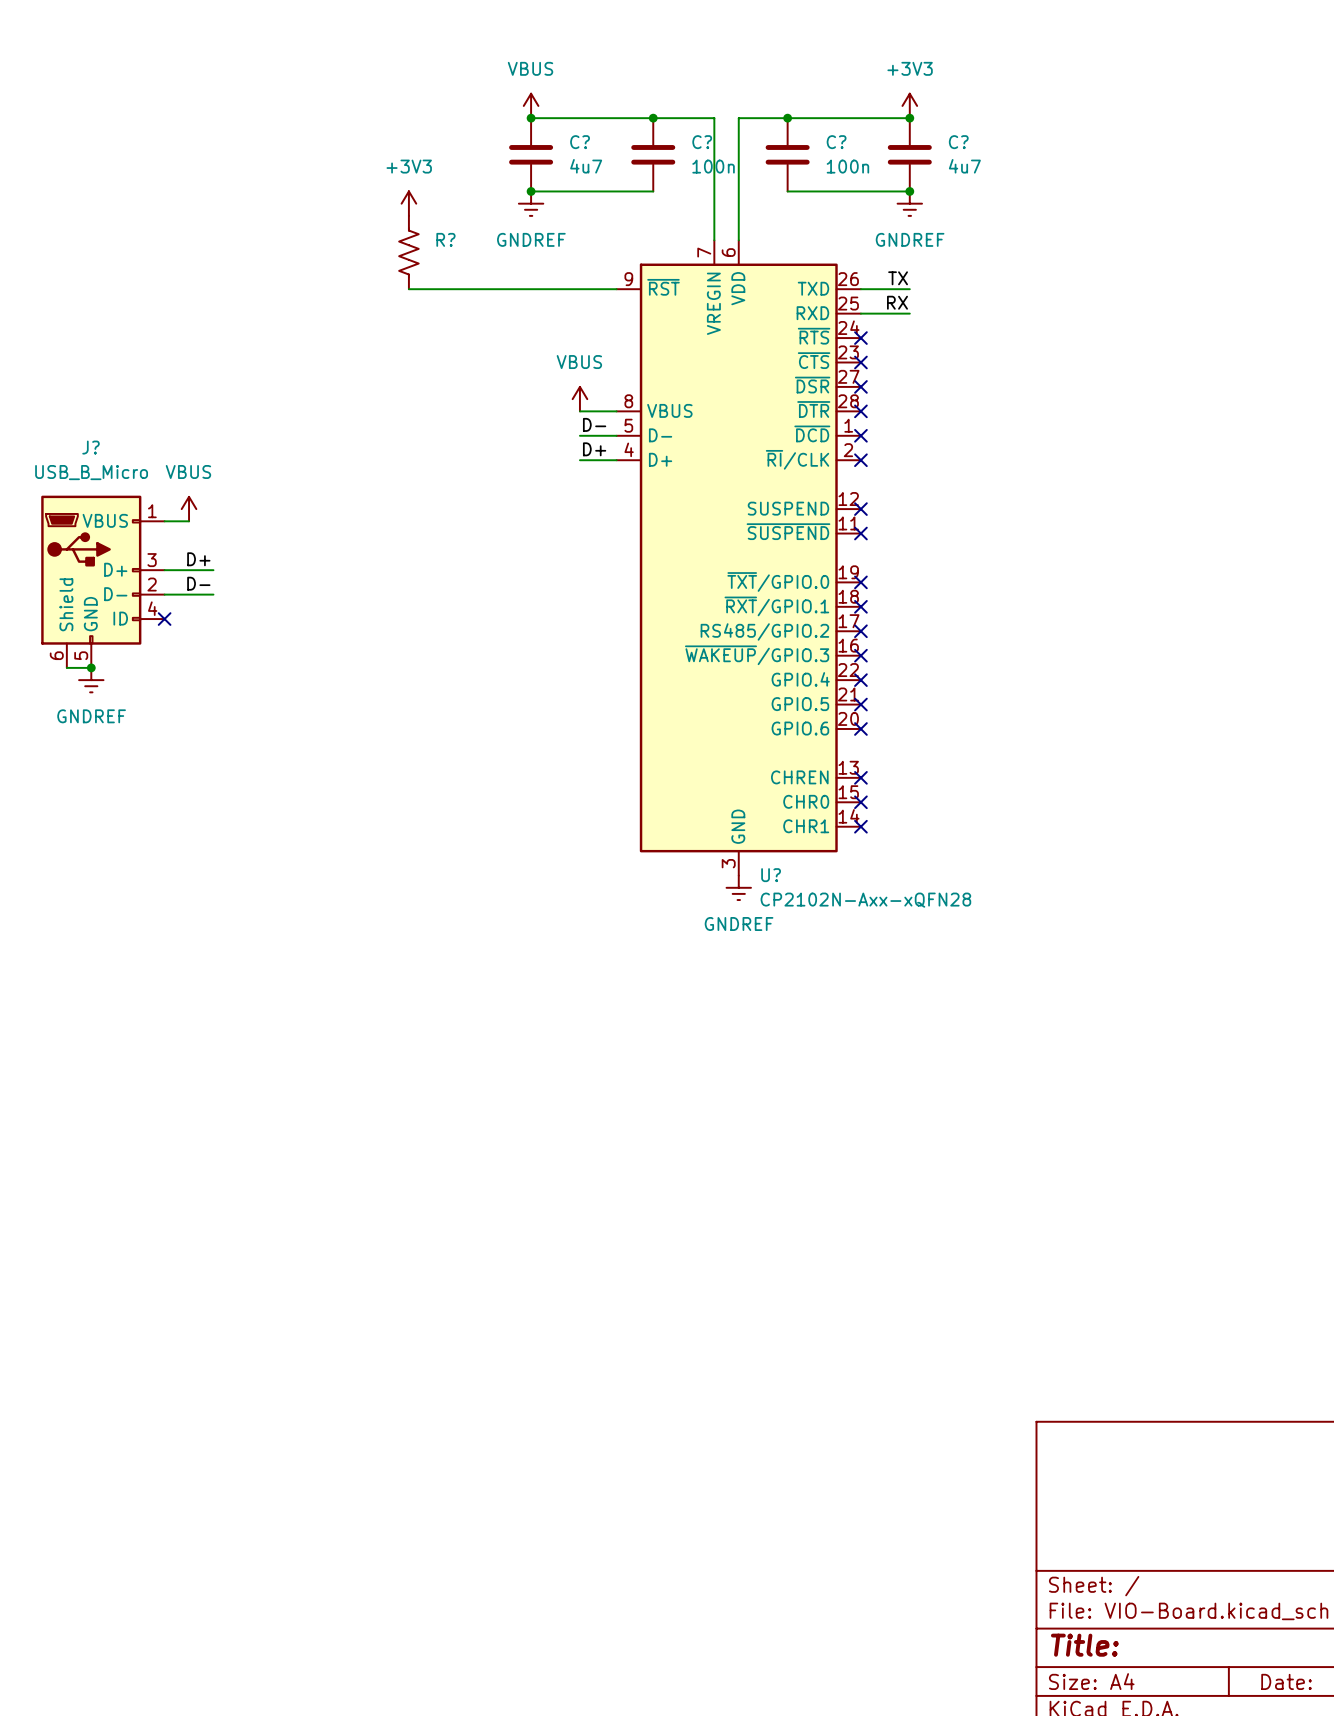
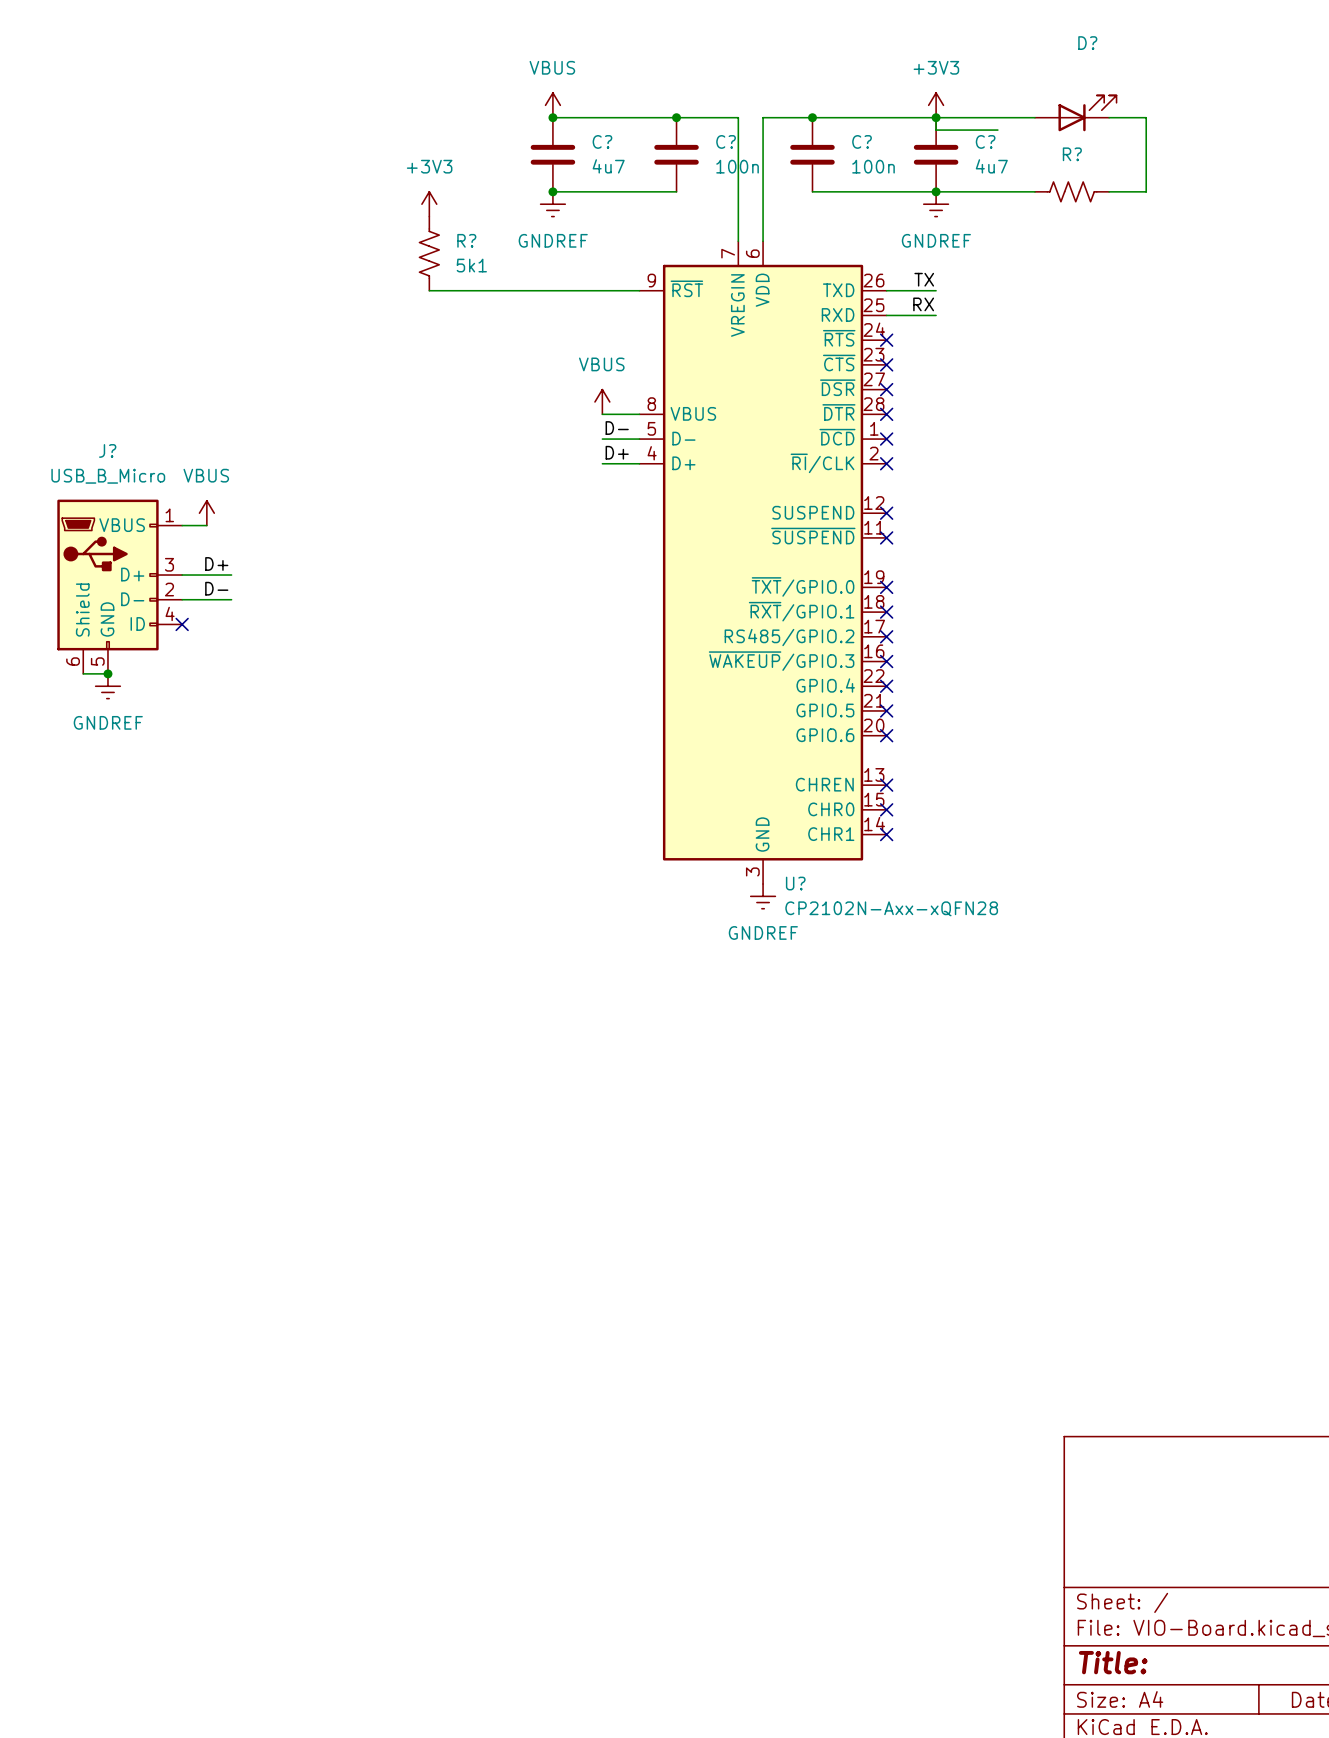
D?: none -> (1075, 113)
wire: none -> (1034, 117) (936, 117) (936, 130) (997, 130)
wire: none -> (1109, 117) (1146, 117) (1146, 191) (1109, 191)
wire: none -> (936, 191) (1034, 191)
R?: none -> (1072, 191)
R? value: none -> 5k1 (471, 265)

